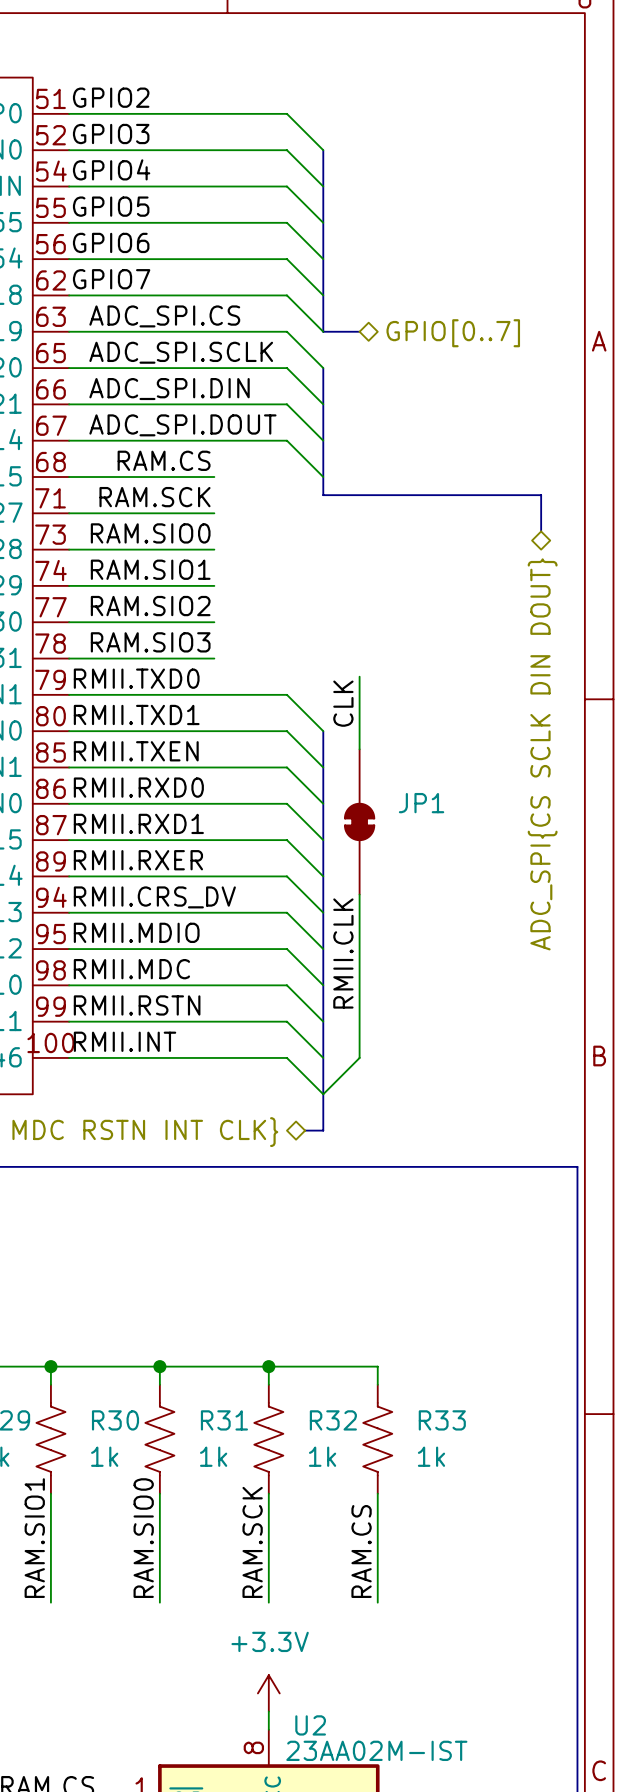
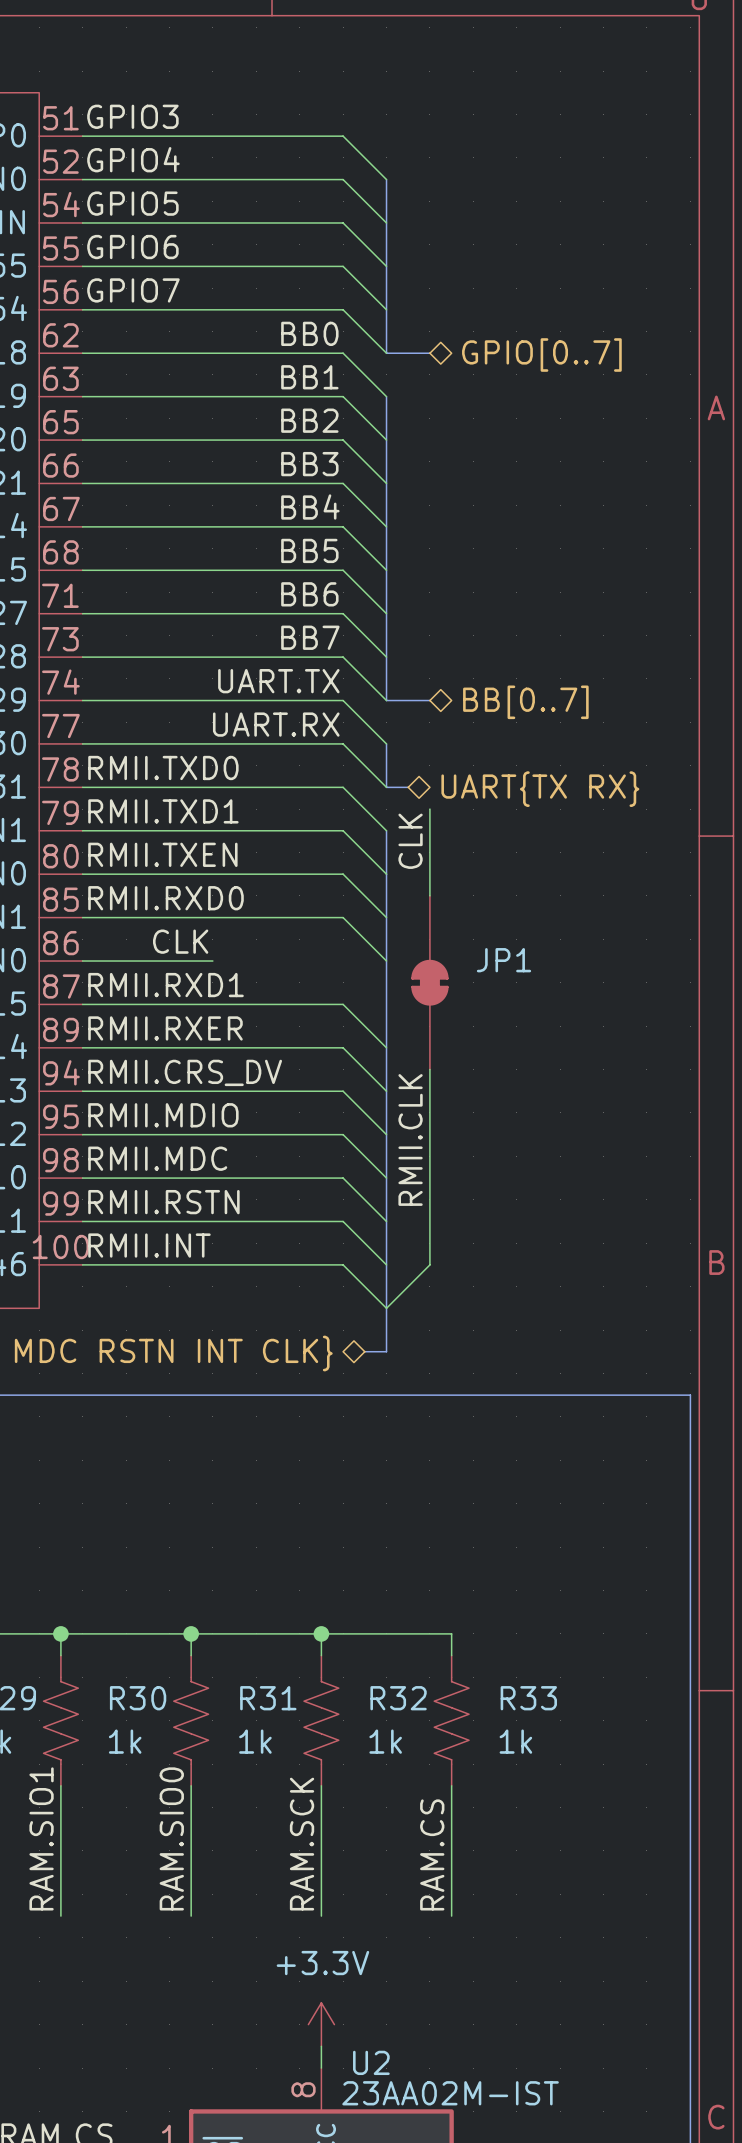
label: GPIO2 (111, 97) -> GPIO3 (132, 116)
label: GPIO3 (111, 134) -> GPIO4 (133, 159)
label: GPIO4 (111, 169) -> GPIO5 (132, 203)
label: GPIO5 (111, 206) -> GPIO6 (132, 247)
label: GPIO6 (111, 242) -> GPIO7 (133, 290)
label: GPIO7 (111, 279) -> none
label: none -> BB0 (309, 333)
bus: (323, 295) (323, 331) (359, 331) -> (386, 353) (429, 353)
label: none -> BB1 (309, 377)
label: ADC_SPI.CS (164, 316) -> none
bus: none -> (386, 396) (386, 440)
hierarchical label position: GPIO[0..7] (453, 333) -> GPIO[0..7] (541, 355)
label: none -> BB2 (309, 420)
label: ADC_SPI.SCLK (181, 352) -> none
label: none -> BB3 (309, 464)
label: ADC_SPI.DIN (169, 389) -> none
label: none -> BB4 (310, 506)
label: ADC_SPI.DOUT (182, 425) -> none
label: RAM.CS (164, 460) -> none
label: none -> BB5 (309, 550)
wire: none -> (256, 570) (343, 570) (386, 613)
bus: (323, 495) (541, 495) (541, 531) -> (386, 592) (386, 700) (429, 700)
label: RAM.SCK (154, 497) -> none
label: none -> BB6 (309, 594)
wire: none -> (256, 613) (343, 613) (386, 657)
label: RAM.SIO0 (150, 533) -> none
label: none -> BB7 (310, 637)
wire: none -> (256, 657) (343, 657) (386, 700)
label: RAM.SIO1 (150, 569) -> none
label: none -> UART.TX (278, 681)
wire: none -> (256, 700) (343, 700) (386, 743)
hierarchical label: none -> BB[0..7] (525, 702)
label: RAM.SIO2 (150, 606) -> none
label: none -> UART.RX (276, 724)
wire: none -> (256, 743) (343, 743) (386, 787)
bus: none -> (386, 743) (386, 787) (408, 787)
label: none -> RMII.TXD0 (163, 767)
label: RAM.SIO3 (150, 642) -> none
wire: none -> (256, 787) (343, 787) (386, 830)
hierarchical label: none -> UART{TX RX} (540, 789)
label: RMII.TXD0 (136, 678) -> RMII.TXD1 (163, 811)
bus: none -> (386, 830) (386, 874)
label: RMII.TXD1 (136, 714) -> RMII.TXEN (162, 854)
label: RMII.TXEN (136, 751) -> RMII.RXD0 (166, 898)
hierarchical label: ADC_SPI{CS SCLK DIN DOUT} (542, 754) -> none
label: RMII.RXD0 (138, 787) -> none
label: none -> CLK (180, 941)
wire: (178, 803) (286, 803) (323, 840) -> none

